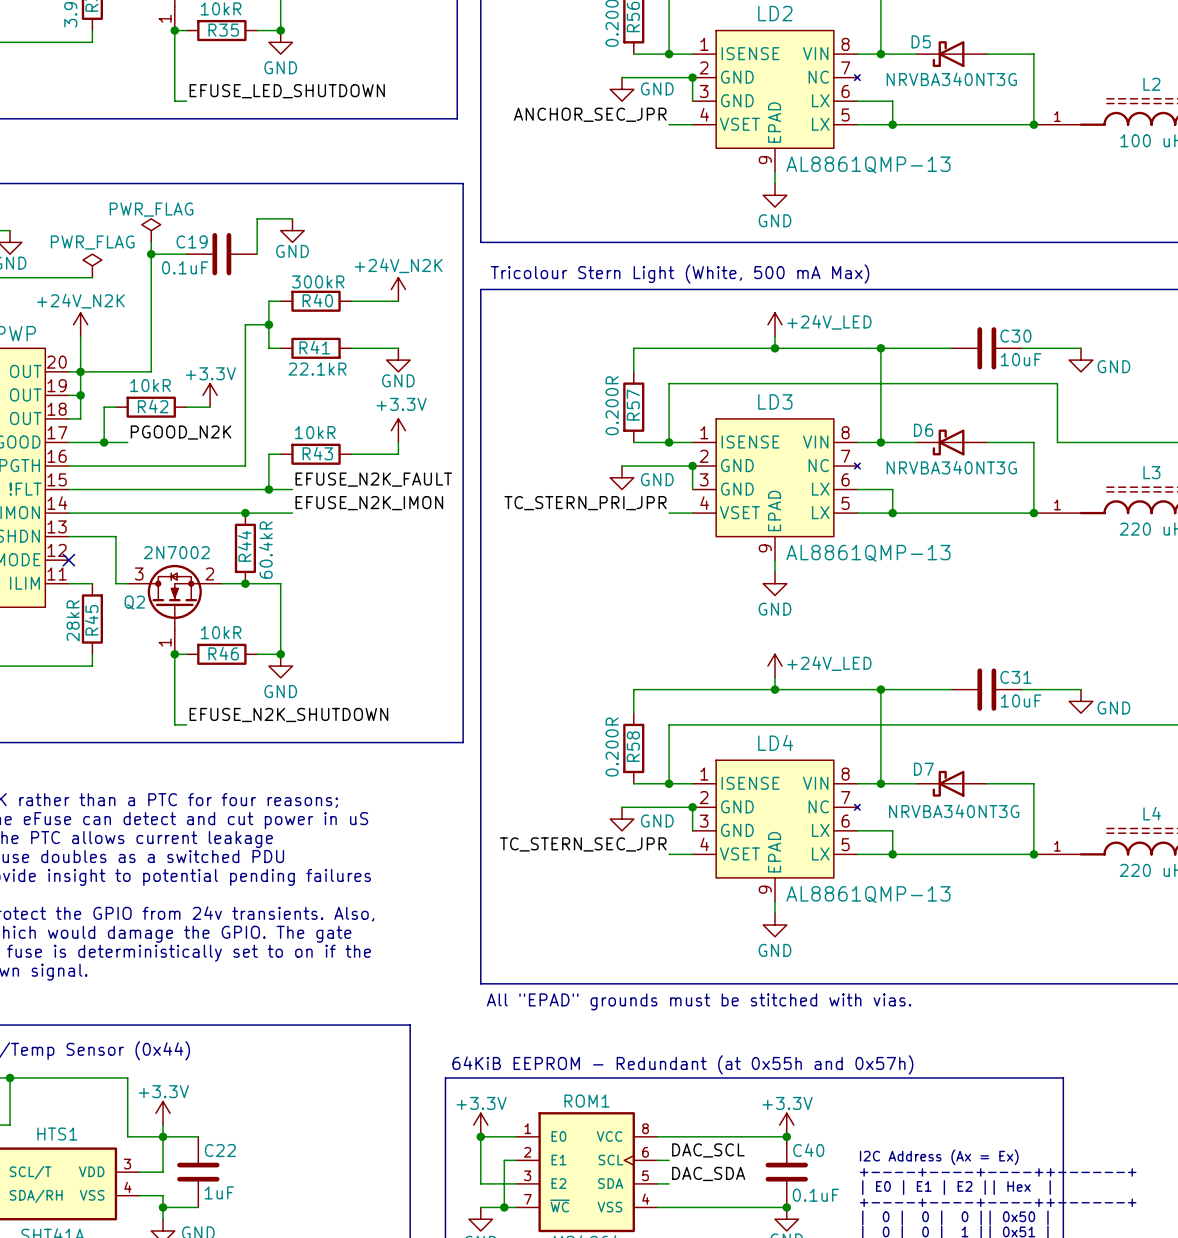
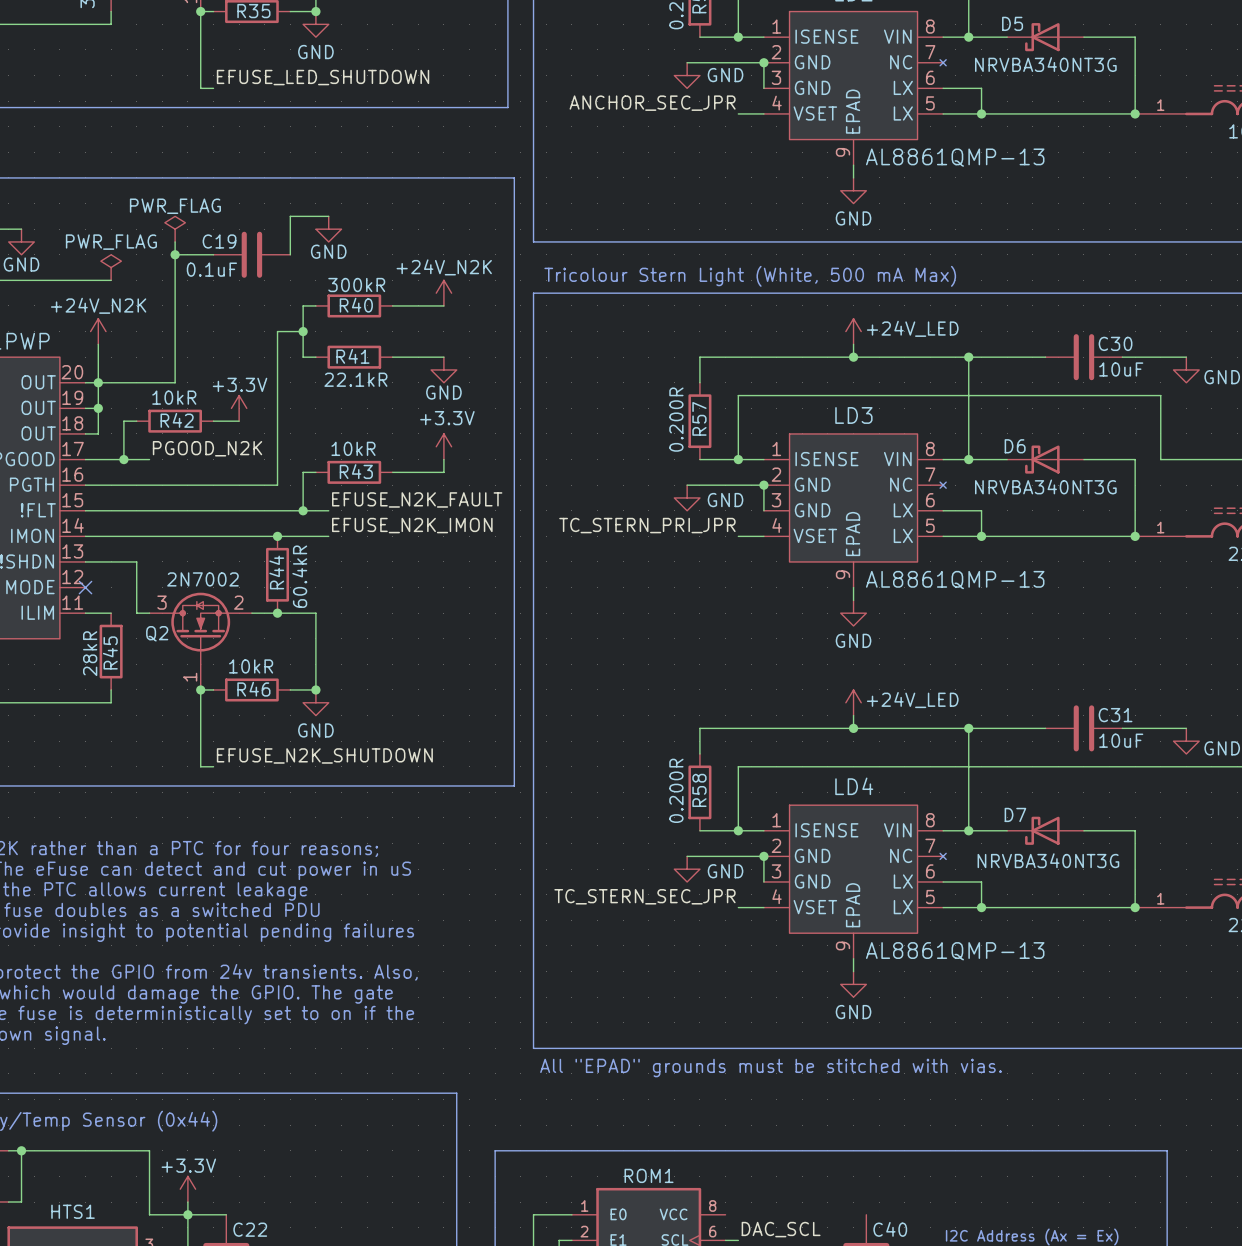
text: 64KiB EEPROM - Redundant (at 0x55h and 0x57h) (682, 1064) -> none
power symbol: +3.3V (480, 1125) -> none
power symbol: +3.3V (786, 1125) -> none
junction: (480, 1136) -> none
wire: (657, 1136) (786, 1136) -> none
junction: (786, 1136) -> none

